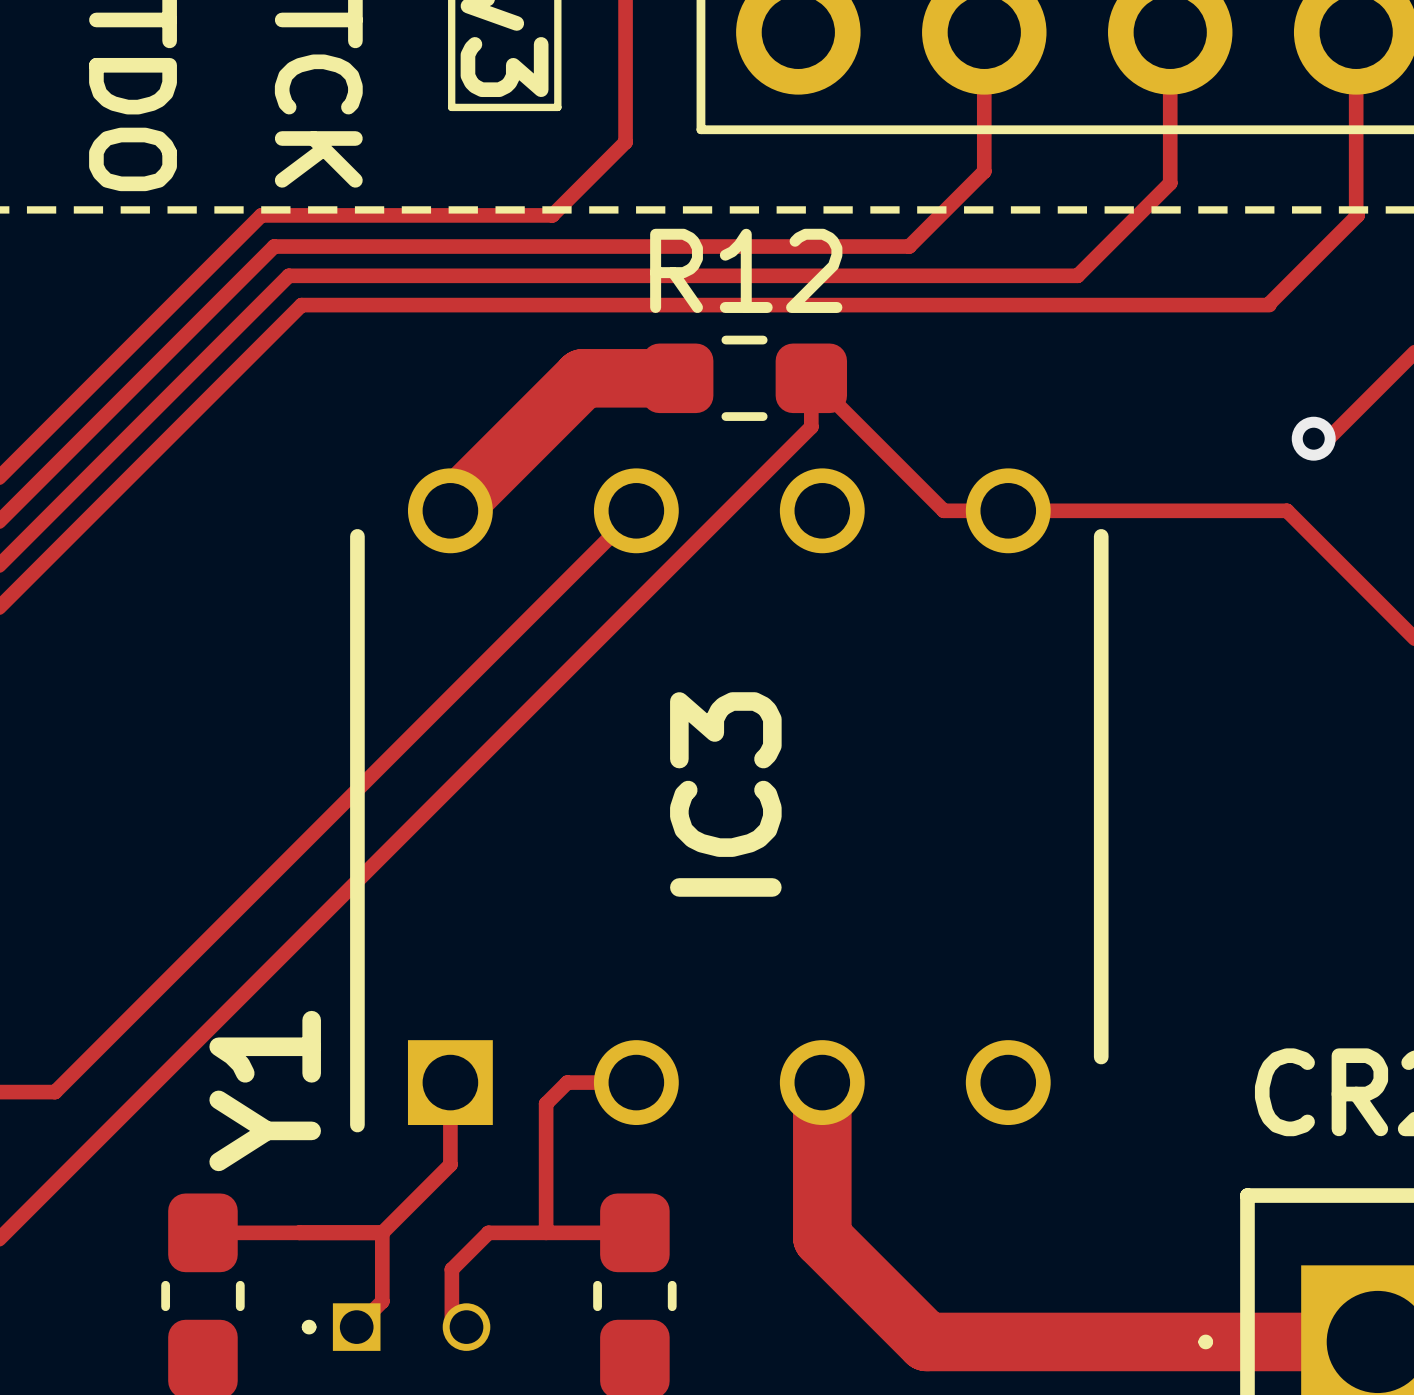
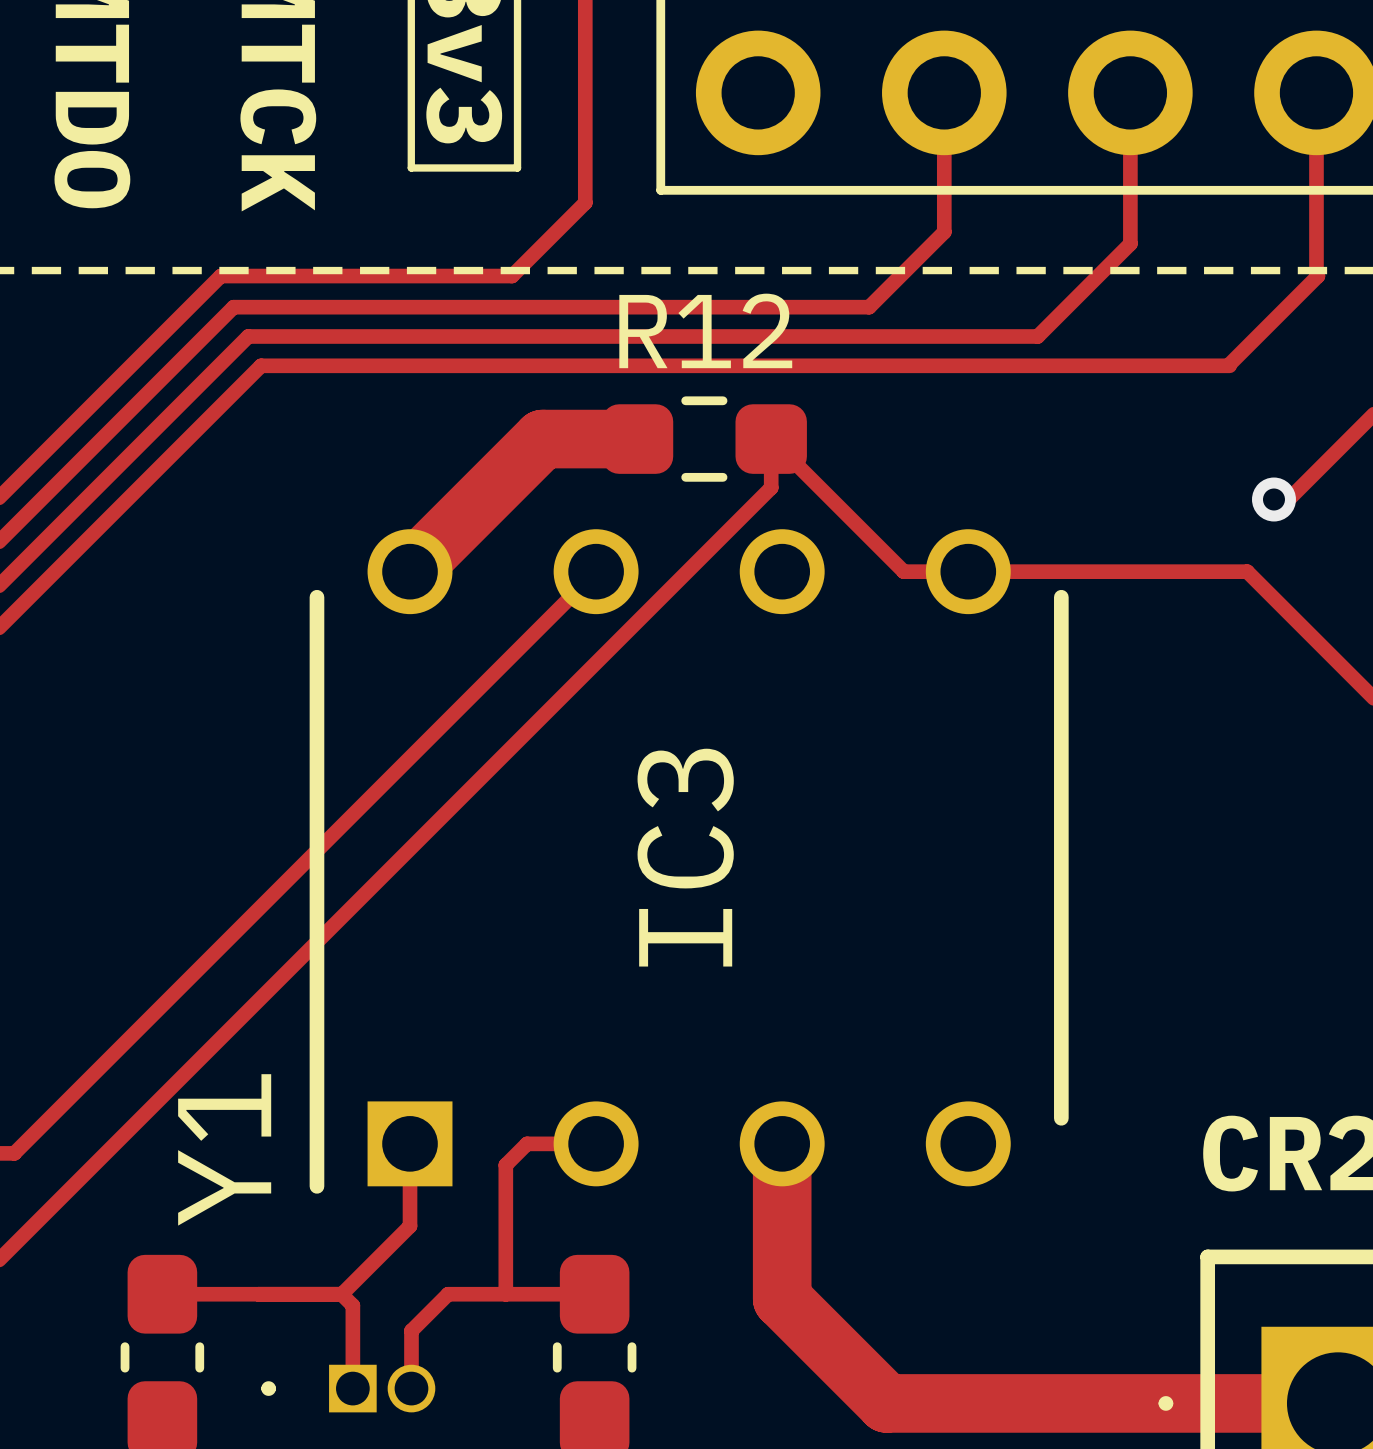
track: (382, 1232) (382, 1301) (356, 1327) -> (341, 1294) (352, 1305) (352, 1388)
Y1 footprint: [301, 1303, 491, 1351] -> [261, 1364, 436, 1413]

